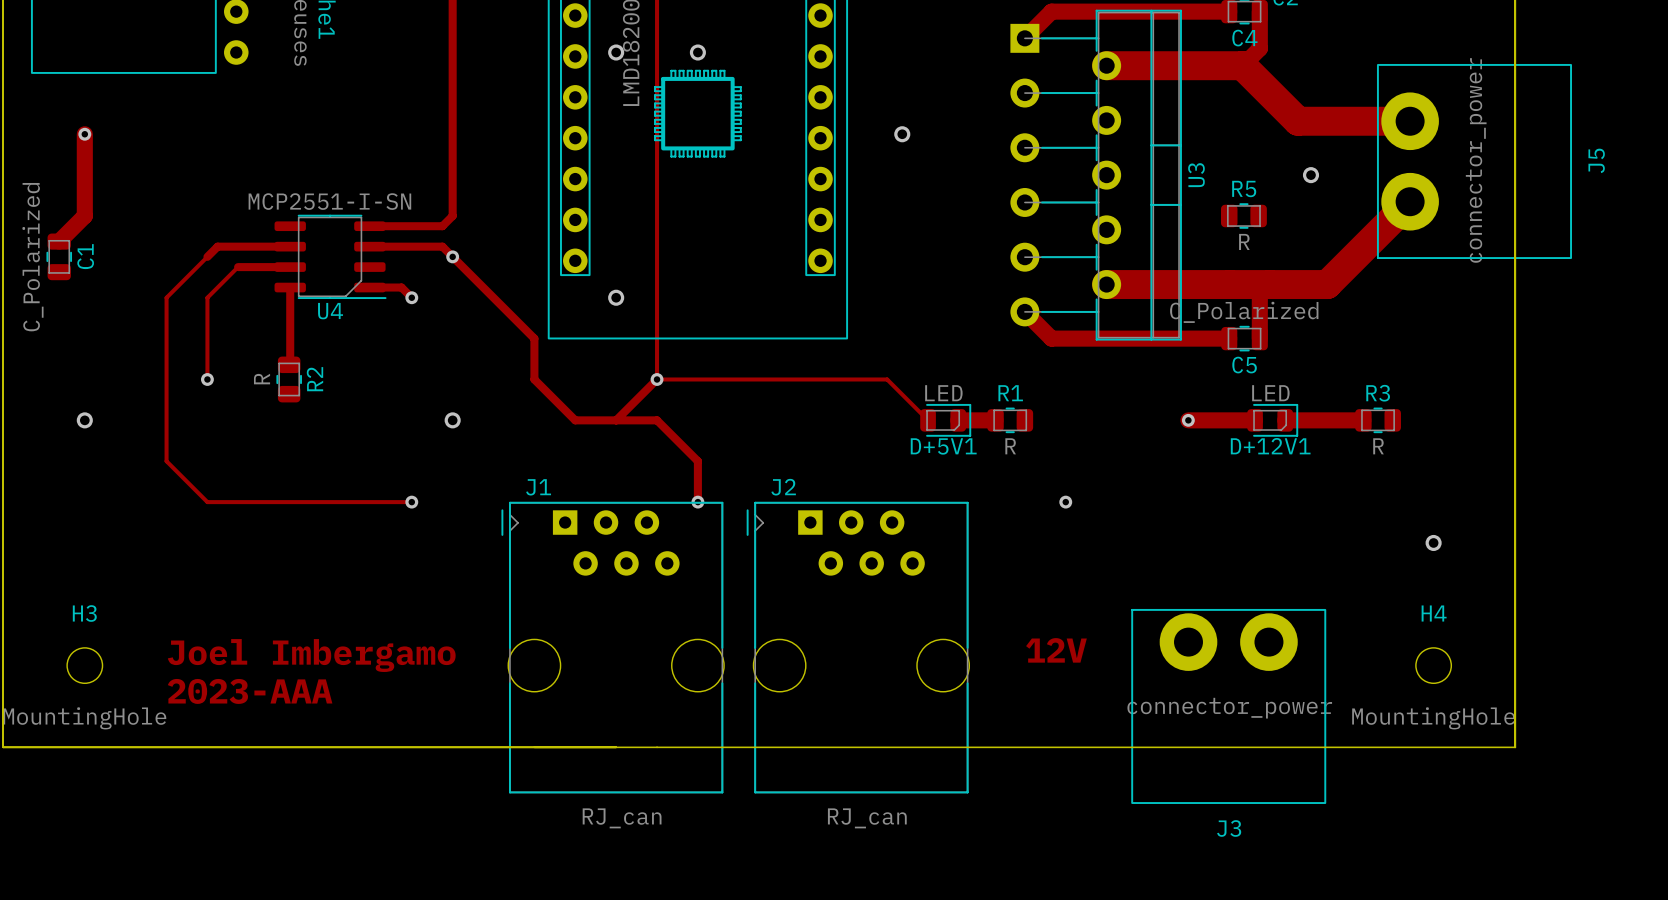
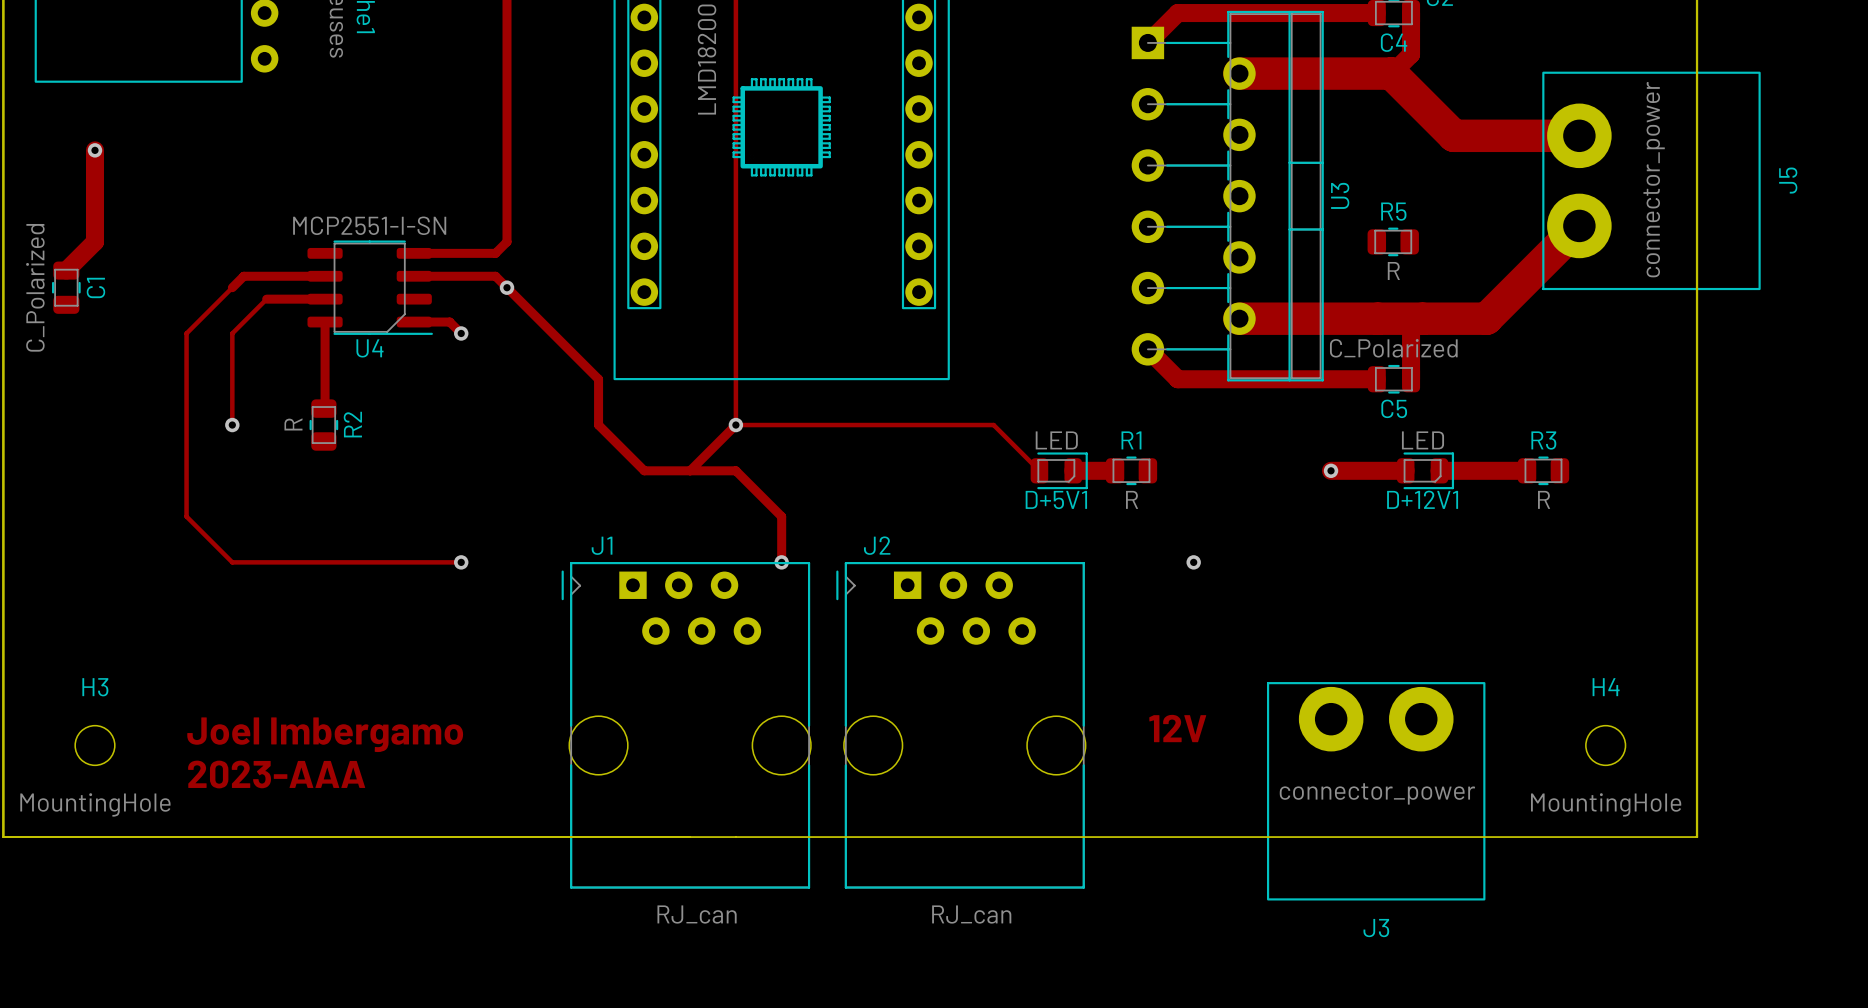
via: (616, 52) -> none
via: (697, 52) -> none
via: (902, 134) -> none
via: (1310, 175) -> none
via: (616, 297) -> none
via: (84, 420) -> none
via: (452, 420) -> none
via: (1433, 542) -> none

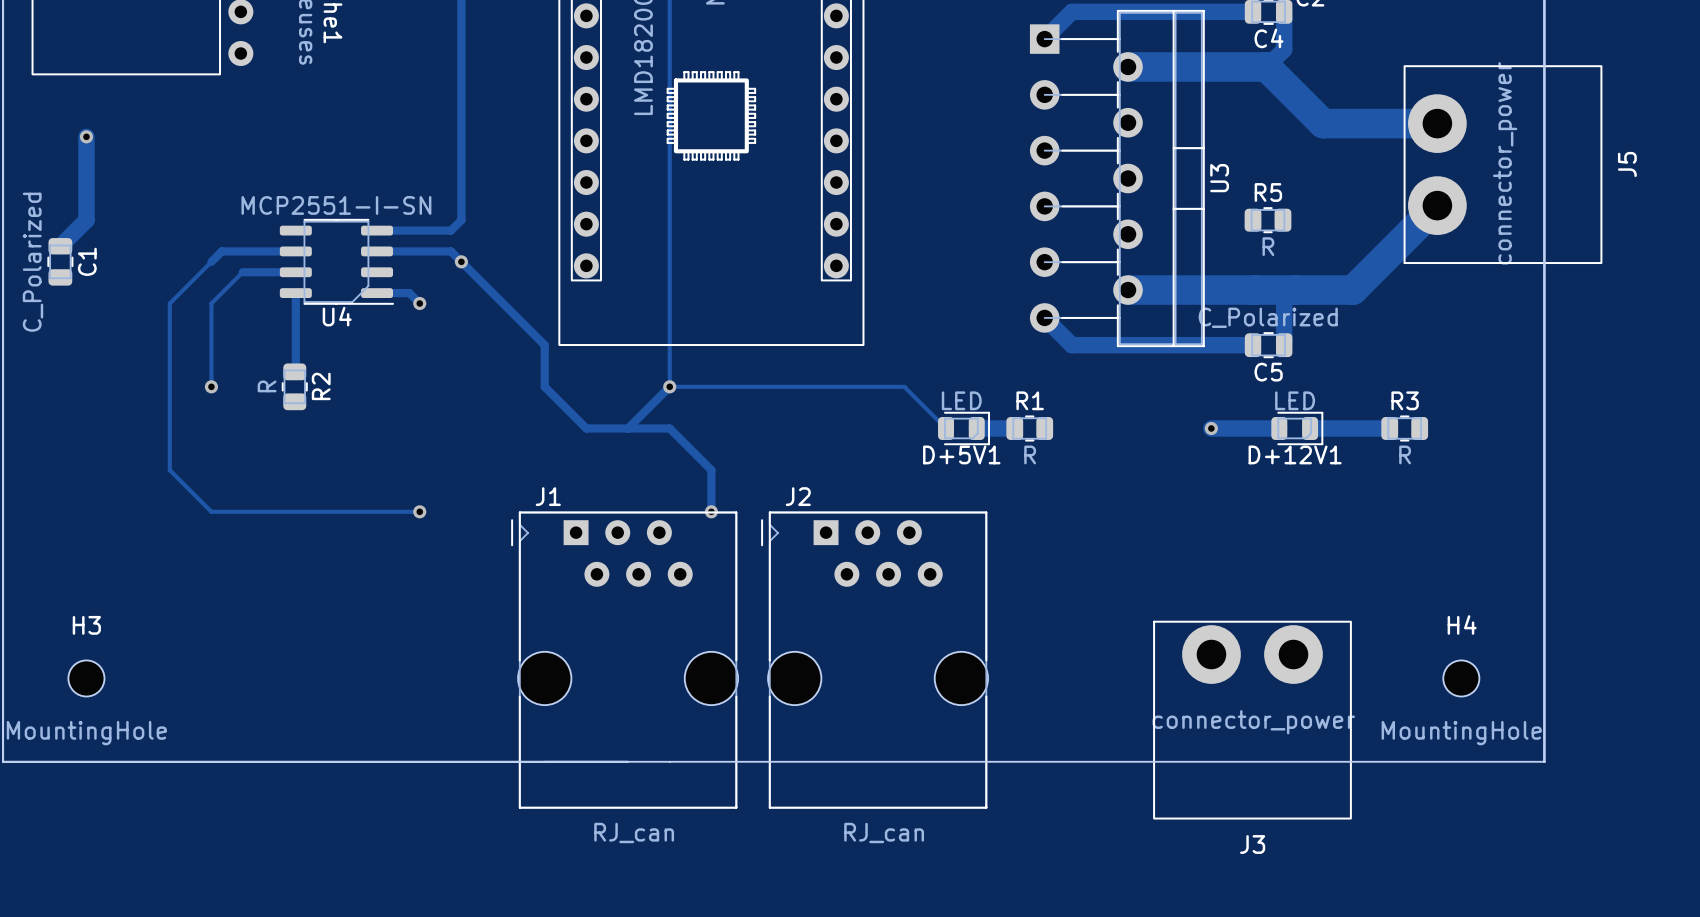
via: (1193, 562) -> none
text: 12V (1177, 728) -> none
text: Joel Imbergamo (325, 734) -> none
text: 2023-AAA (276, 774) -> none

